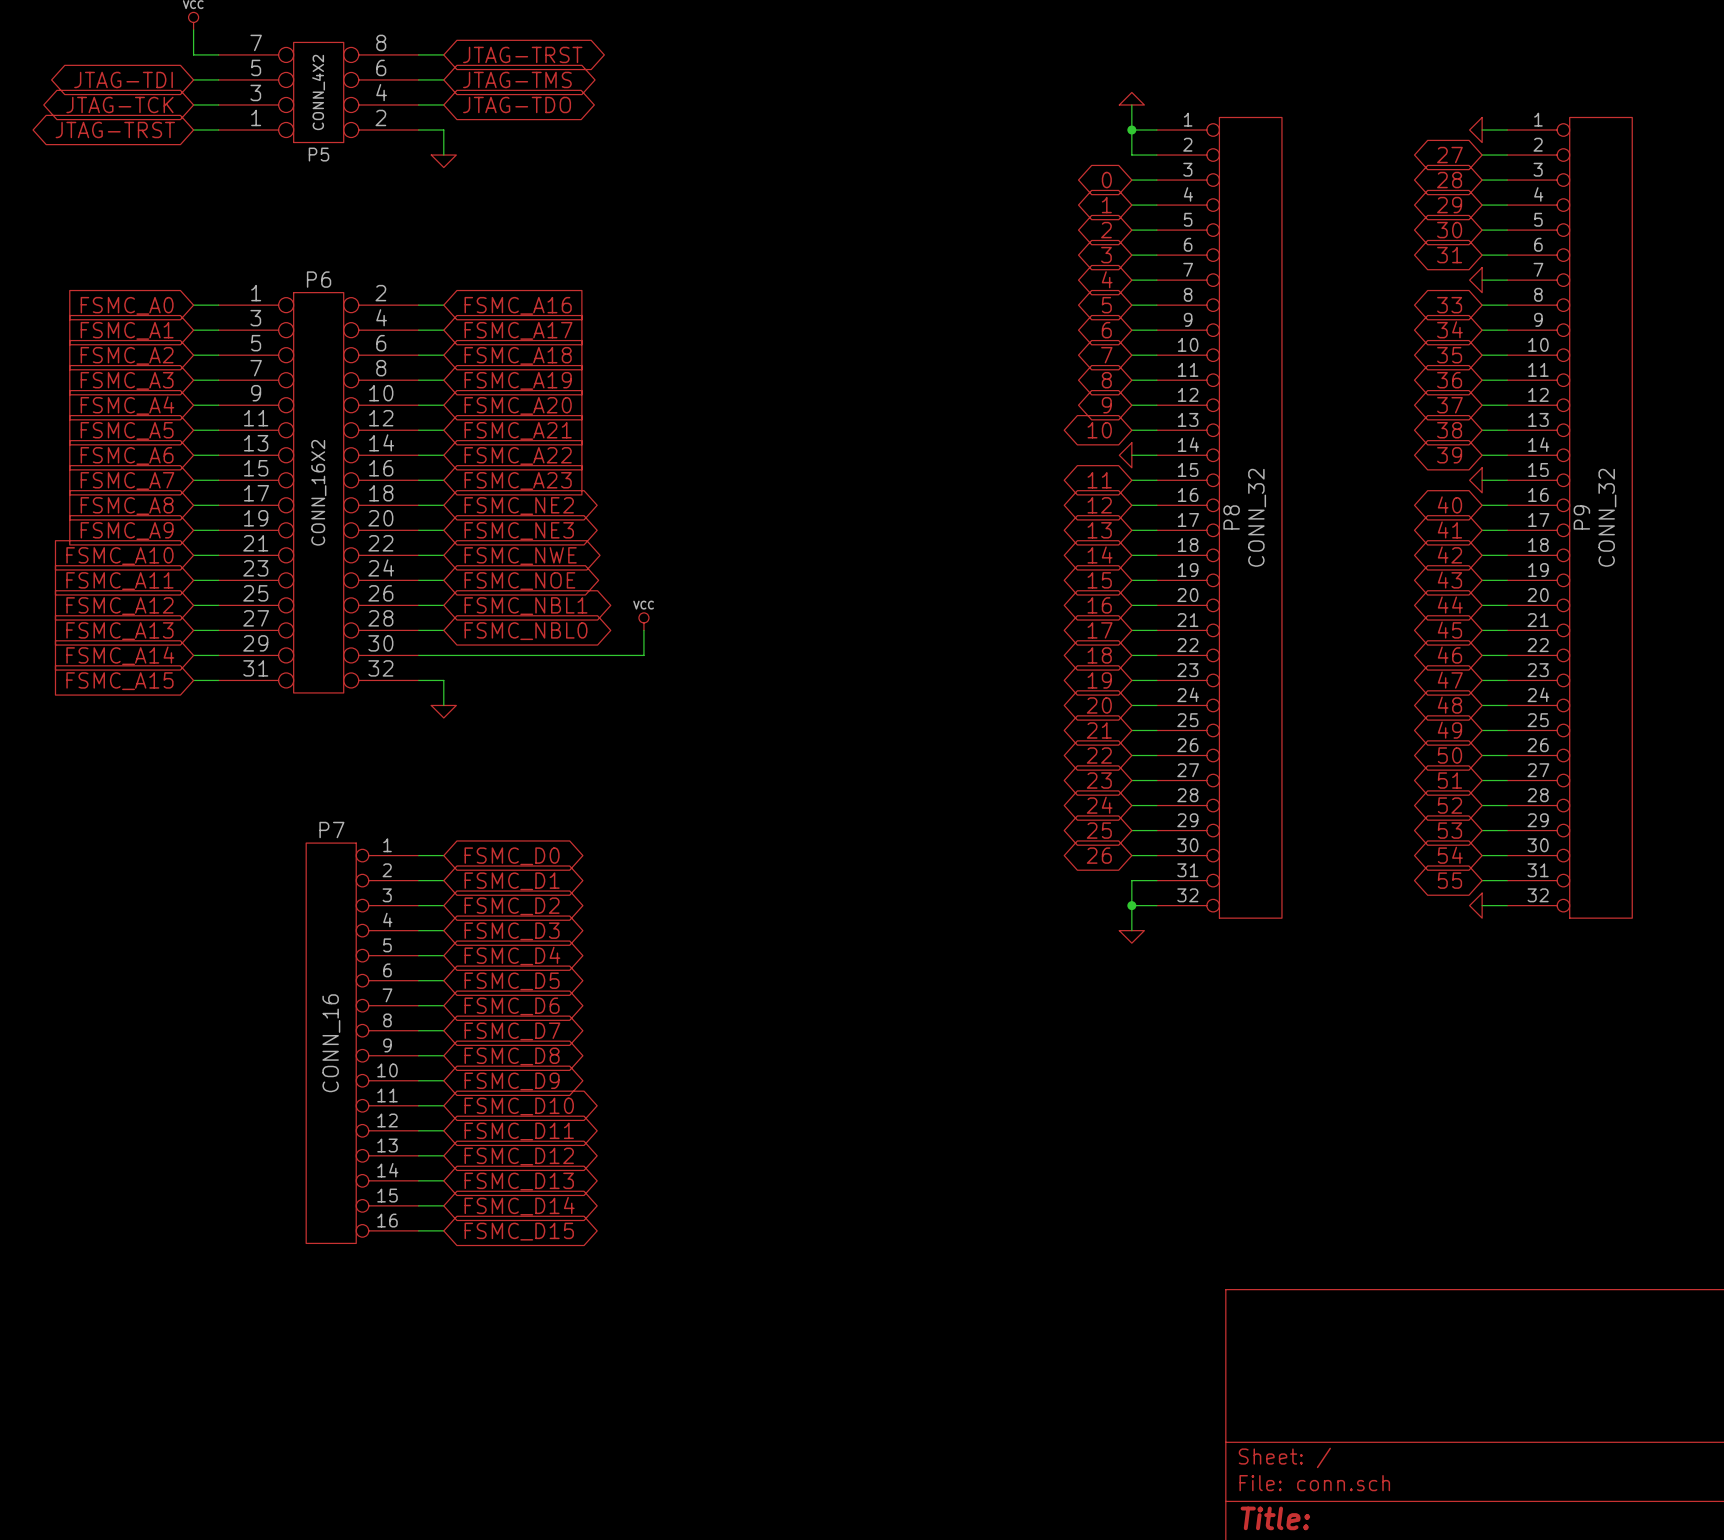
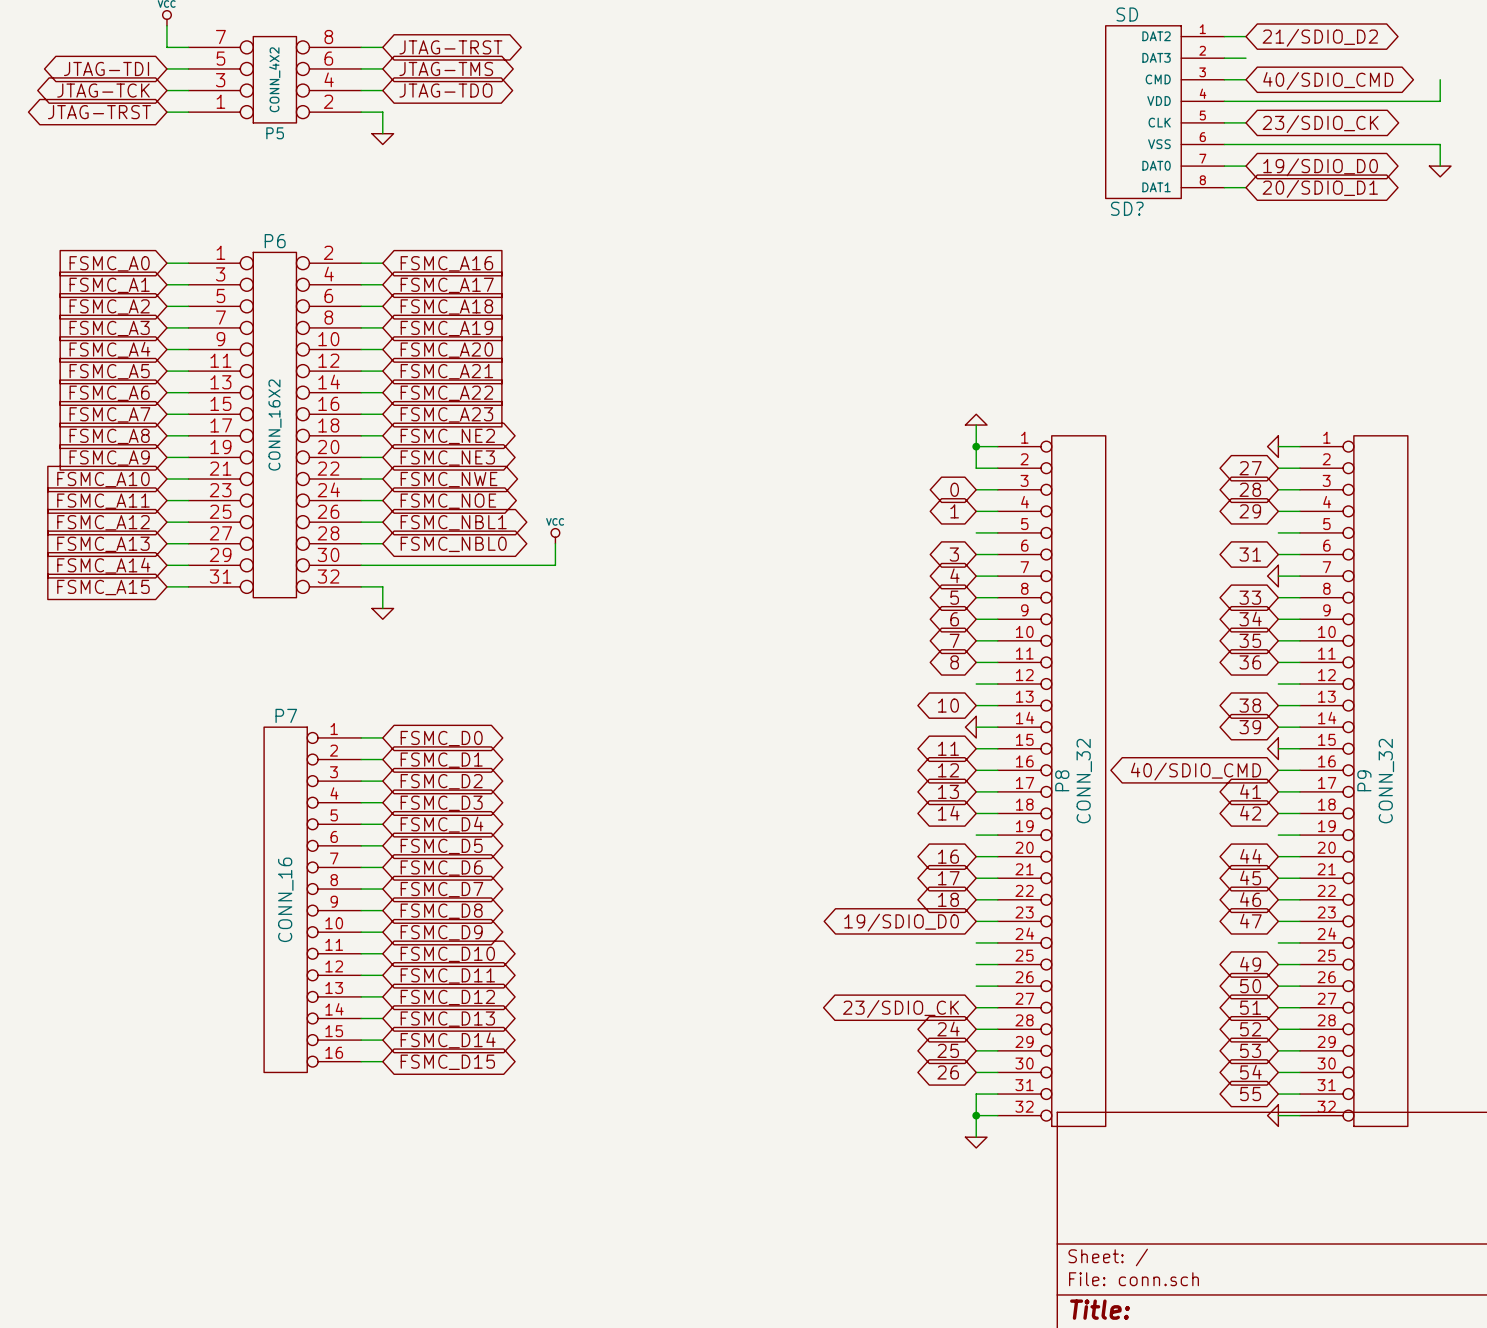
global label: none -> 21/SDIO_D2 (1320, 37)
wire: none -> (1440, 79) (1440, 101) (1224, 101)
global label: none -> 40/SDIO_CMD (1328, 80)
power symbol: (1131, 98) -> none
wire: (1131, 104) (1131, 155) (1156, 155) -> none
wire: (1131, 130) (1156, 130) -> none
junction: (1131, 130) -> none
SD?: none -> SD (1165, 112)
power symbol: (1475, 130) -> none
wire: (1482, 130) (1507, 130) -> (1224, 36) (1245, 36)
global label: none -> 23/SDIO_CK (1320, 124)
global label: 27 (1449, 155) -> none
wire: (1482, 155) (1507, 155) -> (1224, 58) (1245, 58)
wire: none -> (1224, 144) (1440, 144) (1440, 166)
global label: 0 (1106, 180) -> none
wire: (1131, 180) (1156, 180) -> none
global label: 28 (1449, 180) -> none
wire: (1482, 180) (1507, 180) -> (1224, 79) (1245, 79)
global label: none -> 19/SDIO_D0 (1320, 167)
power symbol: none -> (1440, 171)
global label: 1 (1106, 205) -> none
wire: (1131, 205) (1156, 205) -> none
global label: 29 (1449, 205) -> none
wire: (1482, 205) (1507, 205) -> (1224, 187) (1245, 187)
global label: none -> 20/SDIO_D1 (1320, 188)
global label: 2 (1106, 230) -> none
wire: (1131, 230) (1156, 230) -> none
global label: 30 (1449, 230) -> none
wire: (1482, 230) (1507, 230) -> (1224, 122) (1245, 122)
global label: 3 (1106, 255) -> none
wire: (1131, 255) (1156, 255) -> none
global label: 31 (1449, 255) -> none
wire: (1482, 255) (1507, 255) -> (1224, 166) (1245, 166)
global label: 4 (1107, 279) -> none
wire: (1131, 280) (1156, 280) -> (976, 446) (997, 446)
power symbol: (1475, 280) -> none
wire: (1482, 280) (1507, 280) -> (1278, 446) (1299, 446)
global label: 5 (1106, 305) -> none
wire: (1131, 305) (1156, 305) -> none
global label: 33 (1449, 305) -> none
wire: (1482, 305) (1507, 305) -> (1278, 468) (1299, 468)
global label: 34 (1449, 329) -> none
global label: 6 (1106, 330) -> none
wire: (1131, 330) (1156, 330) -> (976, 489) (997, 489)
wire: (1482, 330) (1507, 330) -> (1278, 489) (1299, 489)
global label: 7 (1106, 355) -> none
wire: (1131, 355) (1156, 355) -> (976, 511) (997, 511)
global label: 35 (1449, 355) -> none
wire: (1482, 355) (1507, 355) -> (1278, 511) (1299, 511)
global label: 8 (1106, 380) -> none
wire: (1131, 380) (1156, 380) -> (976, 532) (997, 532)
global label: 36 (1449, 380) -> none
wire: (1482, 380) (1507, 380) -> (1278, 532) (1299, 532)
global label: 9 (1106, 405) -> none
wire: (1131, 405) (1156, 405) -> (976, 554) (997, 554)
global label: 37 (1449, 405) -> none
wire: (1482, 405) (1507, 405) -> (1278, 554) (1299, 554)
global label: 10 (1099, 430) -> none
wire: (1131, 430) (1156, 430) -> (976, 576) (997, 576)
global label: 38 (1449, 430) -> none
wire: (1482, 430) (1507, 430) -> (1278, 576) (1299, 576)
power symbol rotation: 0° (1125, 455) -> 90° clockwise (976, 419)
power symbol position: (1125, 455) -> (976, 419)
wire: (1131, 455) (1156, 455) -> (976, 597) (997, 597)
global label: 39 (1449, 455) -> none
wire: (1482, 455) (1507, 455) -> (1278, 597) (1299, 597)
global label: 11 (1099, 480) -> none
wire: (1131, 480) (1156, 480) -> (976, 619) (997, 619)
power symbol position: (1475, 480) -> (1272, 446)
wire: (1482, 480) (1507, 480) -> (1278, 619) (1299, 619)
wire: none -> (976, 425) (976, 468) (997, 468)
global label: 40 (1449, 504) -> none
global label: 12 (1099, 505) -> none
wire: (1131, 505) (1156, 505) -> (976, 640) (997, 640)
wire: (1482, 505) (1507, 505) -> (1278, 640) (1299, 640)
junction: none -> (976, 446)
P8 position: (1219, 517) -> (1051, 781)
P9 position: (1569, 517) -> (1353, 781)
global label: 41 (1449, 529) -> none
global label: 13 (1099, 530) -> none
wire: (1131, 530) (1156, 530) -> (976, 662) (997, 662)
wire: (1482, 530) (1507, 530) -> (1278, 662) (1299, 662)
global label: none -> 27 (1250, 468)
global label: 14 (1100, 554) -> none
global label: 42 (1449, 554) -> none
wire: (1131, 555) (1156, 555) -> (976, 684) (997, 684)
wire: (1482, 555) (1507, 555) -> (1278, 684) (1299, 684)
global label: none -> 0 (954, 489)
global label: none -> 28 (1250, 489)
global label: 15 (1099, 580) -> none
wire: (1131, 580) (1156, 580) -> (976, 705) (997, 705)
global label: 43 (1449, 580) -> none
wire: (1482, 580) (1507, 580) -> (1278, 705) (1299, 705)
global label: none -> 1 (954, 511)
global label: none -> 29 (1250, 511)
global label: 16 (1099, 605) -> none
wire: (1131, 605) (1156, 605) -> (976, 727) (997, 727)
global label: 44 (1450, 605) -> none
wire: (1482, 605) (1507, 605) -> (1278, 727) (1299, 727)
global label: 17 (1100, 630) -> none
wire: (1131, 630) (1156, 630) -> (976, 748) (997, 748)
global label: 45 (1449, 630) -> none
wire: (1482, 630) (1507, 630) -> (1278, 748) (1299, 748)
global label: none -> 3 (954, 554)
global label: none -> 31 (1250, 554)
global label: 18 (1099, 655) -> none
wire: (1131, 655) (1156, 655) -> (976, 770) (997, 770)
global label: 46 (1449, 655) -> none
wire: (1482, 655) (1507, 655) -> (1278, 770) (1299, 770)
global label: none -> 4 (954, 575)
power symbol: none -> (1272, 576)
global label: 19 (1099, 680) -> none
wire: (1131, 680) (1156, 680) -> (976, 791) (997, 791)
global label: 47 (1450, 680) -> none
wire: (1482, 680) (1507, 680) -> (1278, 791) (1299, 791)
global label: none -> 5 (954, 597)
global label: none -> 33 (1250, 597)
global label: 20 (1099, 705) -> none
wire: (1131, 705) (1156, 705) -> (976, 813) (997, 813)
global label: 48 (1449, 705) -> none
wire: (1482, 705) (1507, 705) -> (1278, 813) (1299, 813)
global label: none -> 6 (954, 619)
global label: none -> 34 (1250, 618)
global label: 21 (1099, 730) -> none
wire: (1131, 730) (1156, 730) -> (976, 835) (997, 835)
global label: 49 (1449, 730) -> none
wire: (1482, 730) (1507, 730) -> (1278, 835) (1299, 835)
global label: none -> 7 (954, 640)
global label: none -> 35 (1250, 640)
global label: 22 (1099, 755) -> none
wire: (1131, 755) (1156, 755) -> (976, 856) (997, 856)
global label: 50 (1449, 755) -> none
wire: (1482, 755) (1507, 755) -> (1278, 856) (1299, 856)
global label: none -> 8 (954, 662)
global label: none -> 36 (1250, 662)
global label: 23 (1099, 780) -> none
wire: (1131, 780) (1156, 780) -> (976, 878) (997, 878)
global label: 51 (1449, 780) -> none
wire: (1482, 780) (1507, 780) -> (1278, 878) (1299, 878)
global label: 24 (1099, 805) -> none
wire: (1131, 805) (1156, 805) -> (976, 899) (997, 899)
global label: 52 (1449, 805) -> none
wire: (1482, 805) (1507, 805) -> (1278, 899) (1299, 899)
global label: none -> 10 (948, 705)
global label: none -> 38 (1250, 705)
global label: 25 (1099, 830) -> none
wire: (1131, 830) (1156, 830) -> (976, 921) (997, 921)
global label: 53 (1449, 830) -> none
wire: (1482, 830) (1507, 830) -> (1278, 921) (1299, 921)
global label: none -> 39 (1250, 727)
global label: 26 (1099, 855) -> none
wire: (1131, 855) (1156, 855) -> (976, 942) (997, 942)
global label: 54 (1450, 855) -> none
wire: (1482, 855) (1507, 855) -> (1278, 942) (1299, 942)
global label: none -> 11 (948, 748)
wire: (1156, 880) (1131, 880) (1131, 930) -> none
global label: 55 (1449, 880) -> none
wire: (1482, 880) (1507, 880) -> (1278, 964) (1299, 964)
global label: none -> 12 (948, 770)
global label: none -> 40/SDIO_CMD (1196, 771)
wire: (1131, 905) (1156, 905) -> (976, 986) (997, 986)
junction: (1131, 905) -> none
power symbol position: (1475, 905) -> (1272, 748)
wire: (1482, 905) (1507, 905) -> (1278, 986) (1299, 986)
global label: none -> 41 (1250, 791)
global label: none -> 13 (948, 791)
power symbol rotation: 0° (1131, 936) -> 90° clockwise (970, 727)
power symbol position: (1131, 936) -> (970, 727)
global label: none -> 14 (948, 813)
global label: none -> 42 (1250, 813)
global label: none -> 44 (1250, 856)
global label: none -> 16 (948, 856)
global label: none -> 45 (1250, 877)
global label: none -> 17 (948, 878)
global label: none -> 46 (1250, 899)
global label: none -> 18 (948, 899)
global label: none -> 47 (1250, 921)
global label: none -> 19/SDIO_D0 (901, 922)
global label: none -> 49 (1250, 964)
wire: none -> (976, 964) (997, 964)
global label: none -> 50 (1250, 986)
wire: none -> (976, 1007) (997, 1007)
global label: none -> 51 (1250, 1007)
wire: none -> (1278, 1007) (1299, 1007)
global label: none -> 23/SDIO_CK (901, 1008)
global label: none -> 24 (948, 1028)
wire: none -> (976, 1029) (997, 1029)
global label: none -> 52 (1250, 1029)
wire: none -> (1278, 1029) (1299, 1029)
global label: none -> 25 (948, 1050)
wire: none -> (976, 1050) (997, 1050)
global label: none -> 53 (1250, 1050)
wire: none -> (1278, 1050) (1299, 1050)
global label: none -> 26 (948, 1072)
wire: none -> (976, 1072) (997, 1072)
global label: none -> 54 (1250, 1072)
wire: none -> (1278, 1072) (1299, 1072)
wire: none -> (997, 1094) (976, 1094) (976, 1137)
global label: none -> 55 (1250, 1094)
wire: none -> (1278, 1094) (1299, 1094)
wire: none -> (976, 1115) (997, 1115)
junction: none -> (976, 1115)
power symbol: none -> (1272, 1115)
wire: none -> (1278, 1115) (1299, 1115)
power symbol: none -> (976, 1142)

